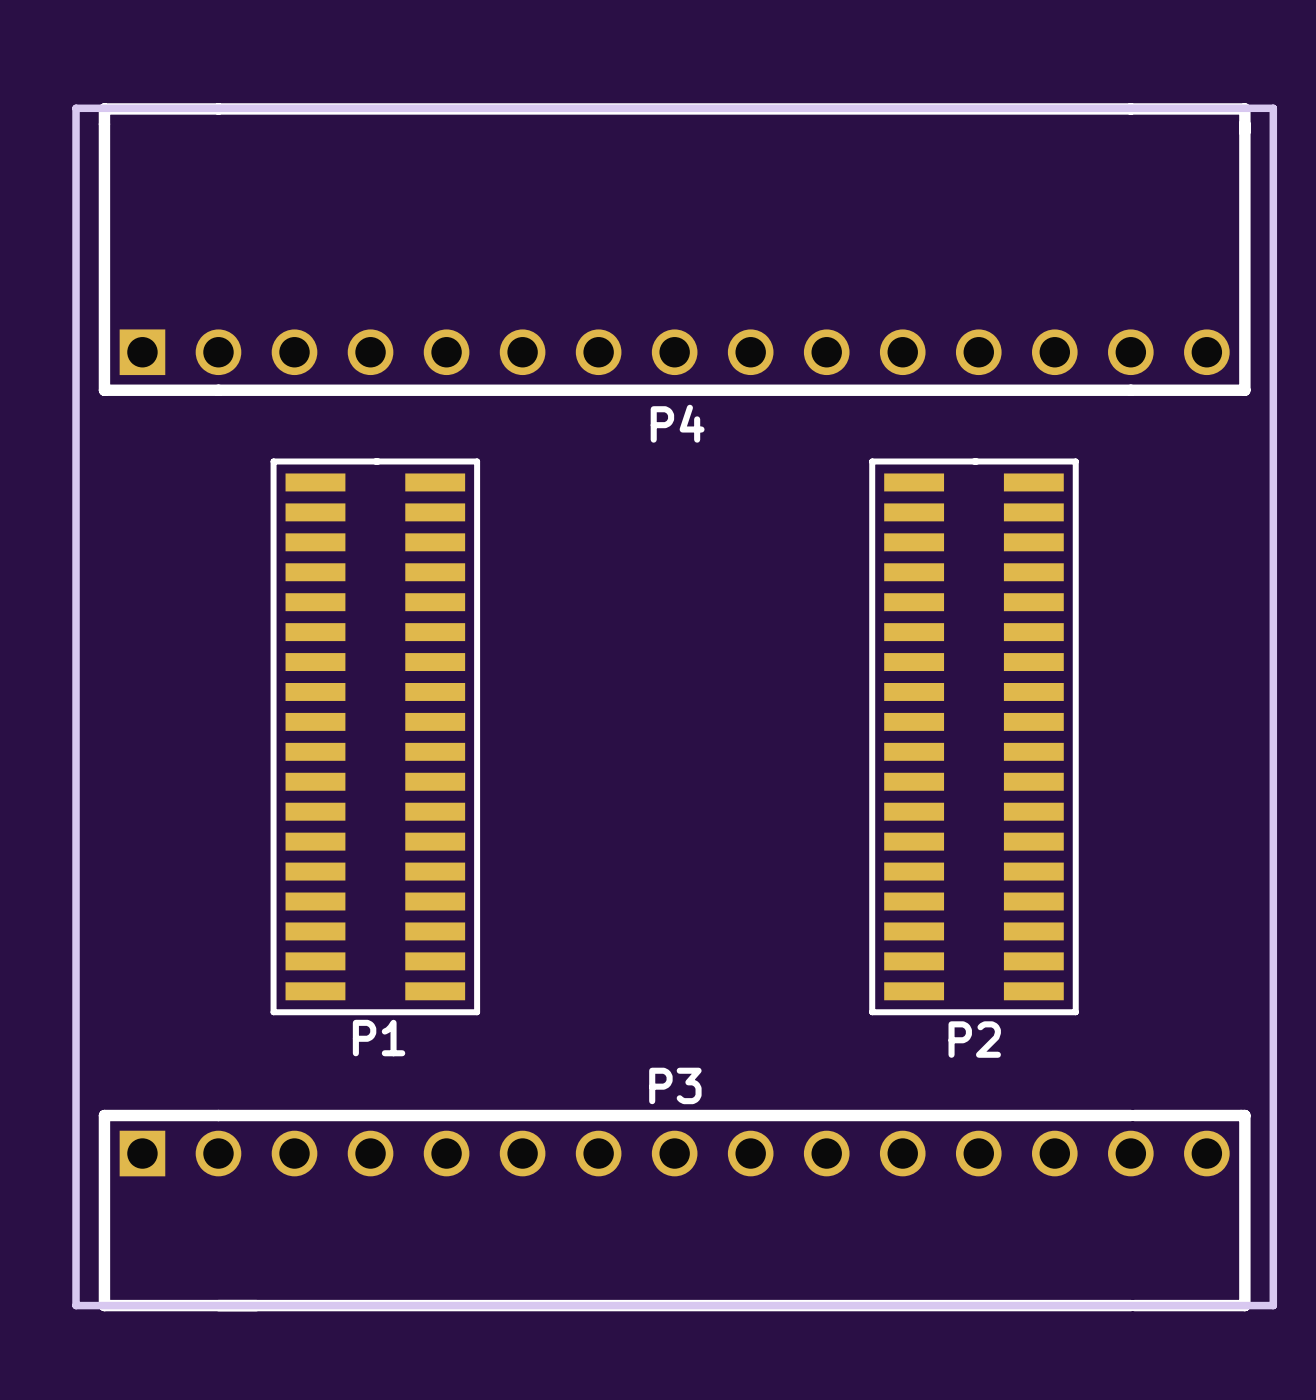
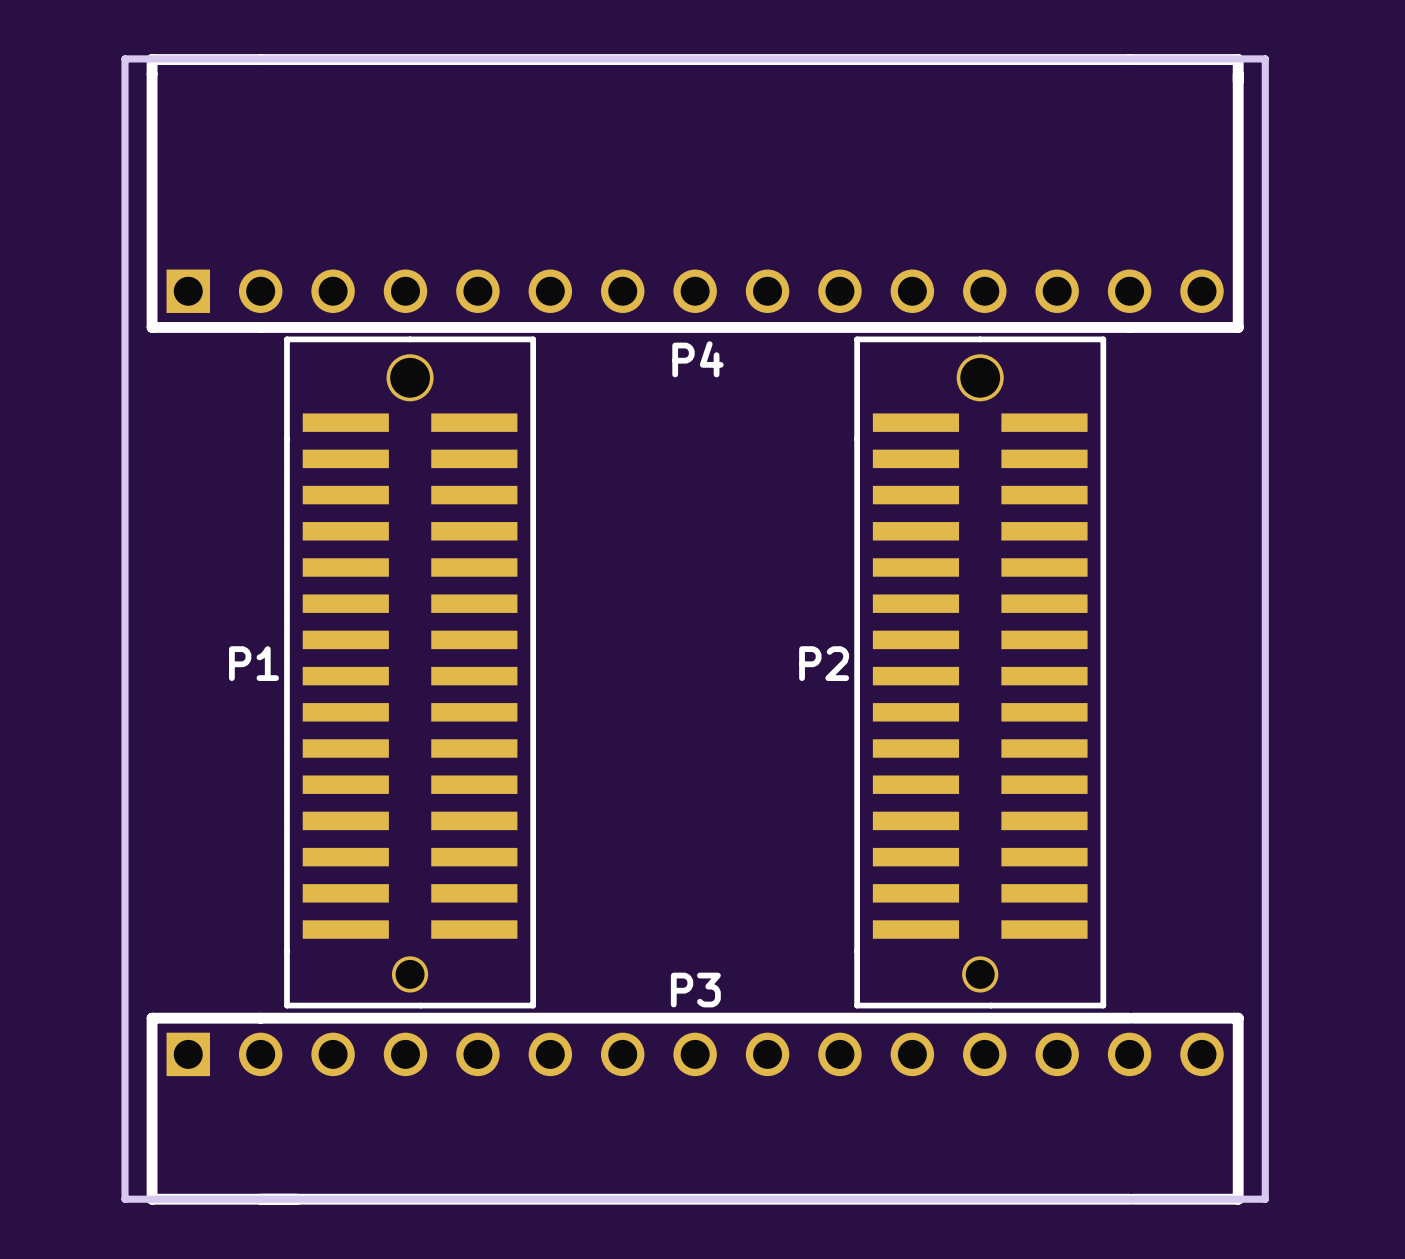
P1 footprint: [270, 458, 481, 1016] -> [284, 336, 537, 1009]
P2 footprint: [869, 458, 1079, 1016] -> [854, 336, 1107, 1009]
P1 name position: P1 (379, 1038) -> P1 (253, 663)
P2 name position: P2 (974, 1039) -> P2 (824, 663)

